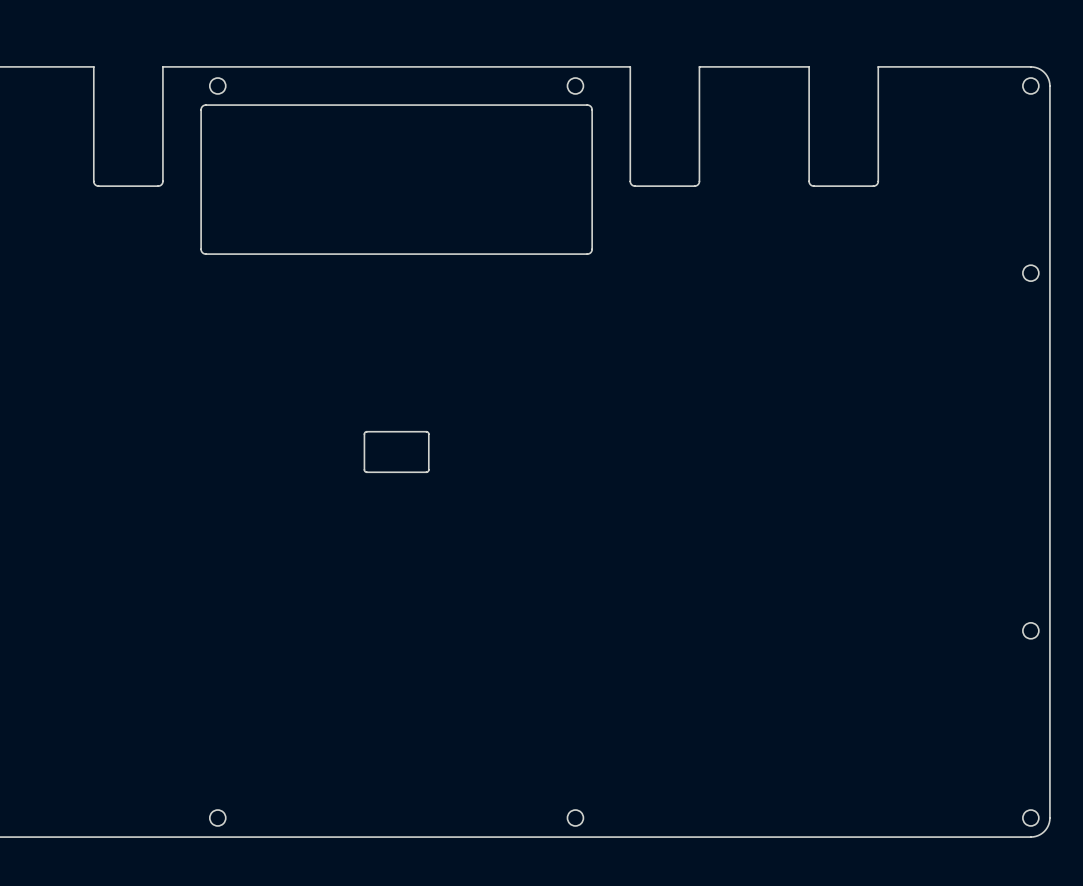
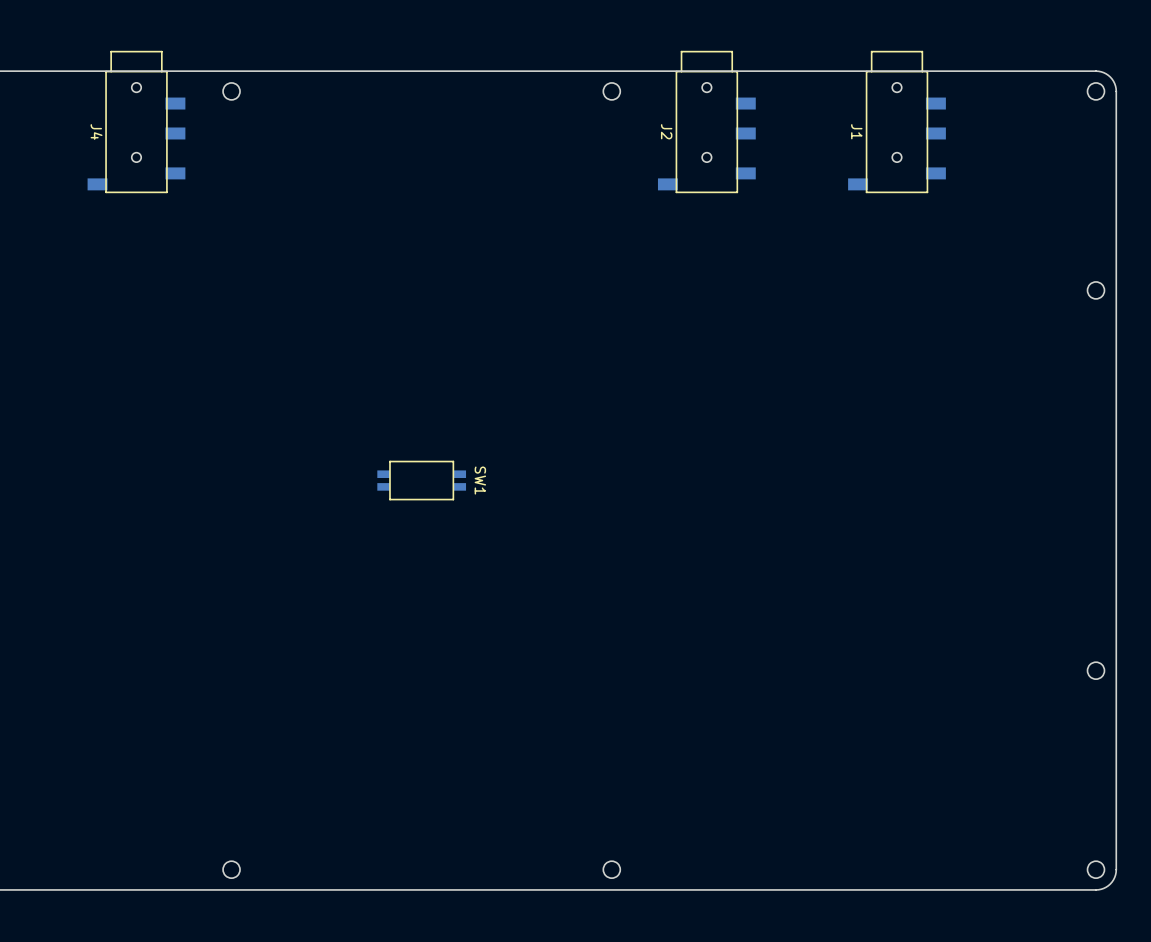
board edge: (162, 66) (162, 183) (158, 186) (98, 186) (93, 181) (93, 66) -> (173, 71) (99, 71)
board edge: (699, 66) (698, 183) (694, 186) (635, 186) (630, 181) (630, 66) -> (743, 71) (670, 71)
board edge: (878, 66) (878, 181) (873, 186) (813, 186) (809, 183) (809, 66) -> (933, 71) (860, 71)
board edge: (587, 105) (204, 105) (201, 109) (201, 251) (205, 254) (589, 253) (592, 249) (592, 109) (587, 105) -> none
J4: none -> (136, 122)
J2: none -> (706, 122)
J1: none -> (896, 122)
board edge: (426, 431) (365, 432) (364, 471) (427, 471) (428, 434) (426, 431) -> none
SW1: none -> (421, 480)

